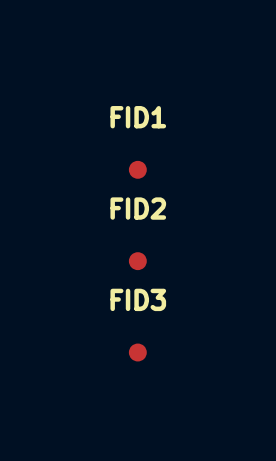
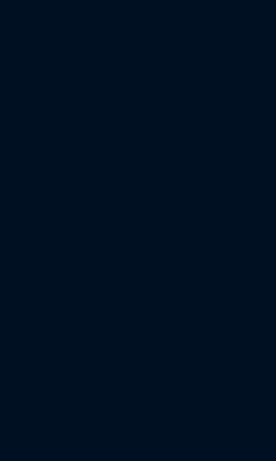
FID1: (137, 169) -> none
FID2: (137, 261) -> none
FID3: (137, 352) -> none

